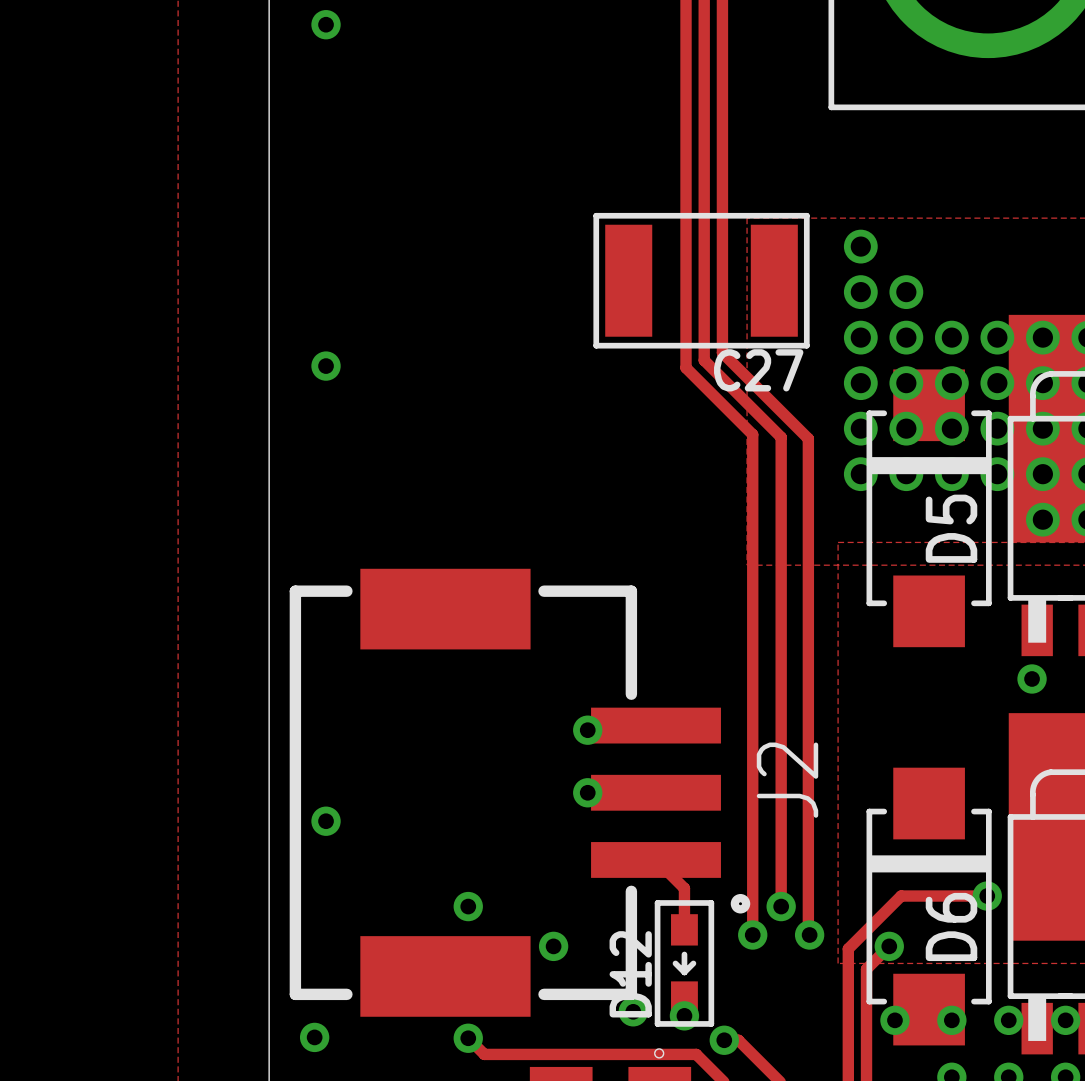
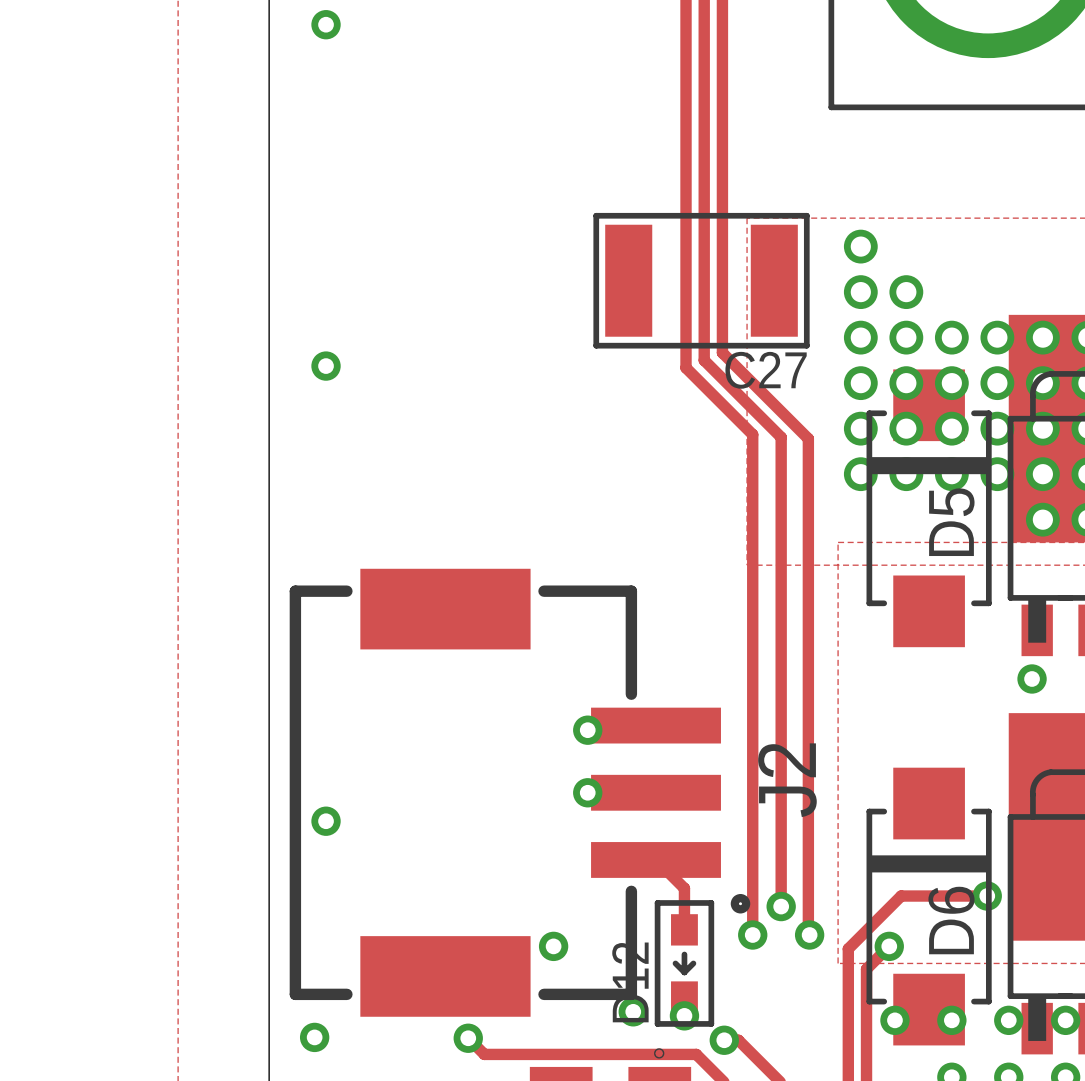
via: (468, 906) -> none

